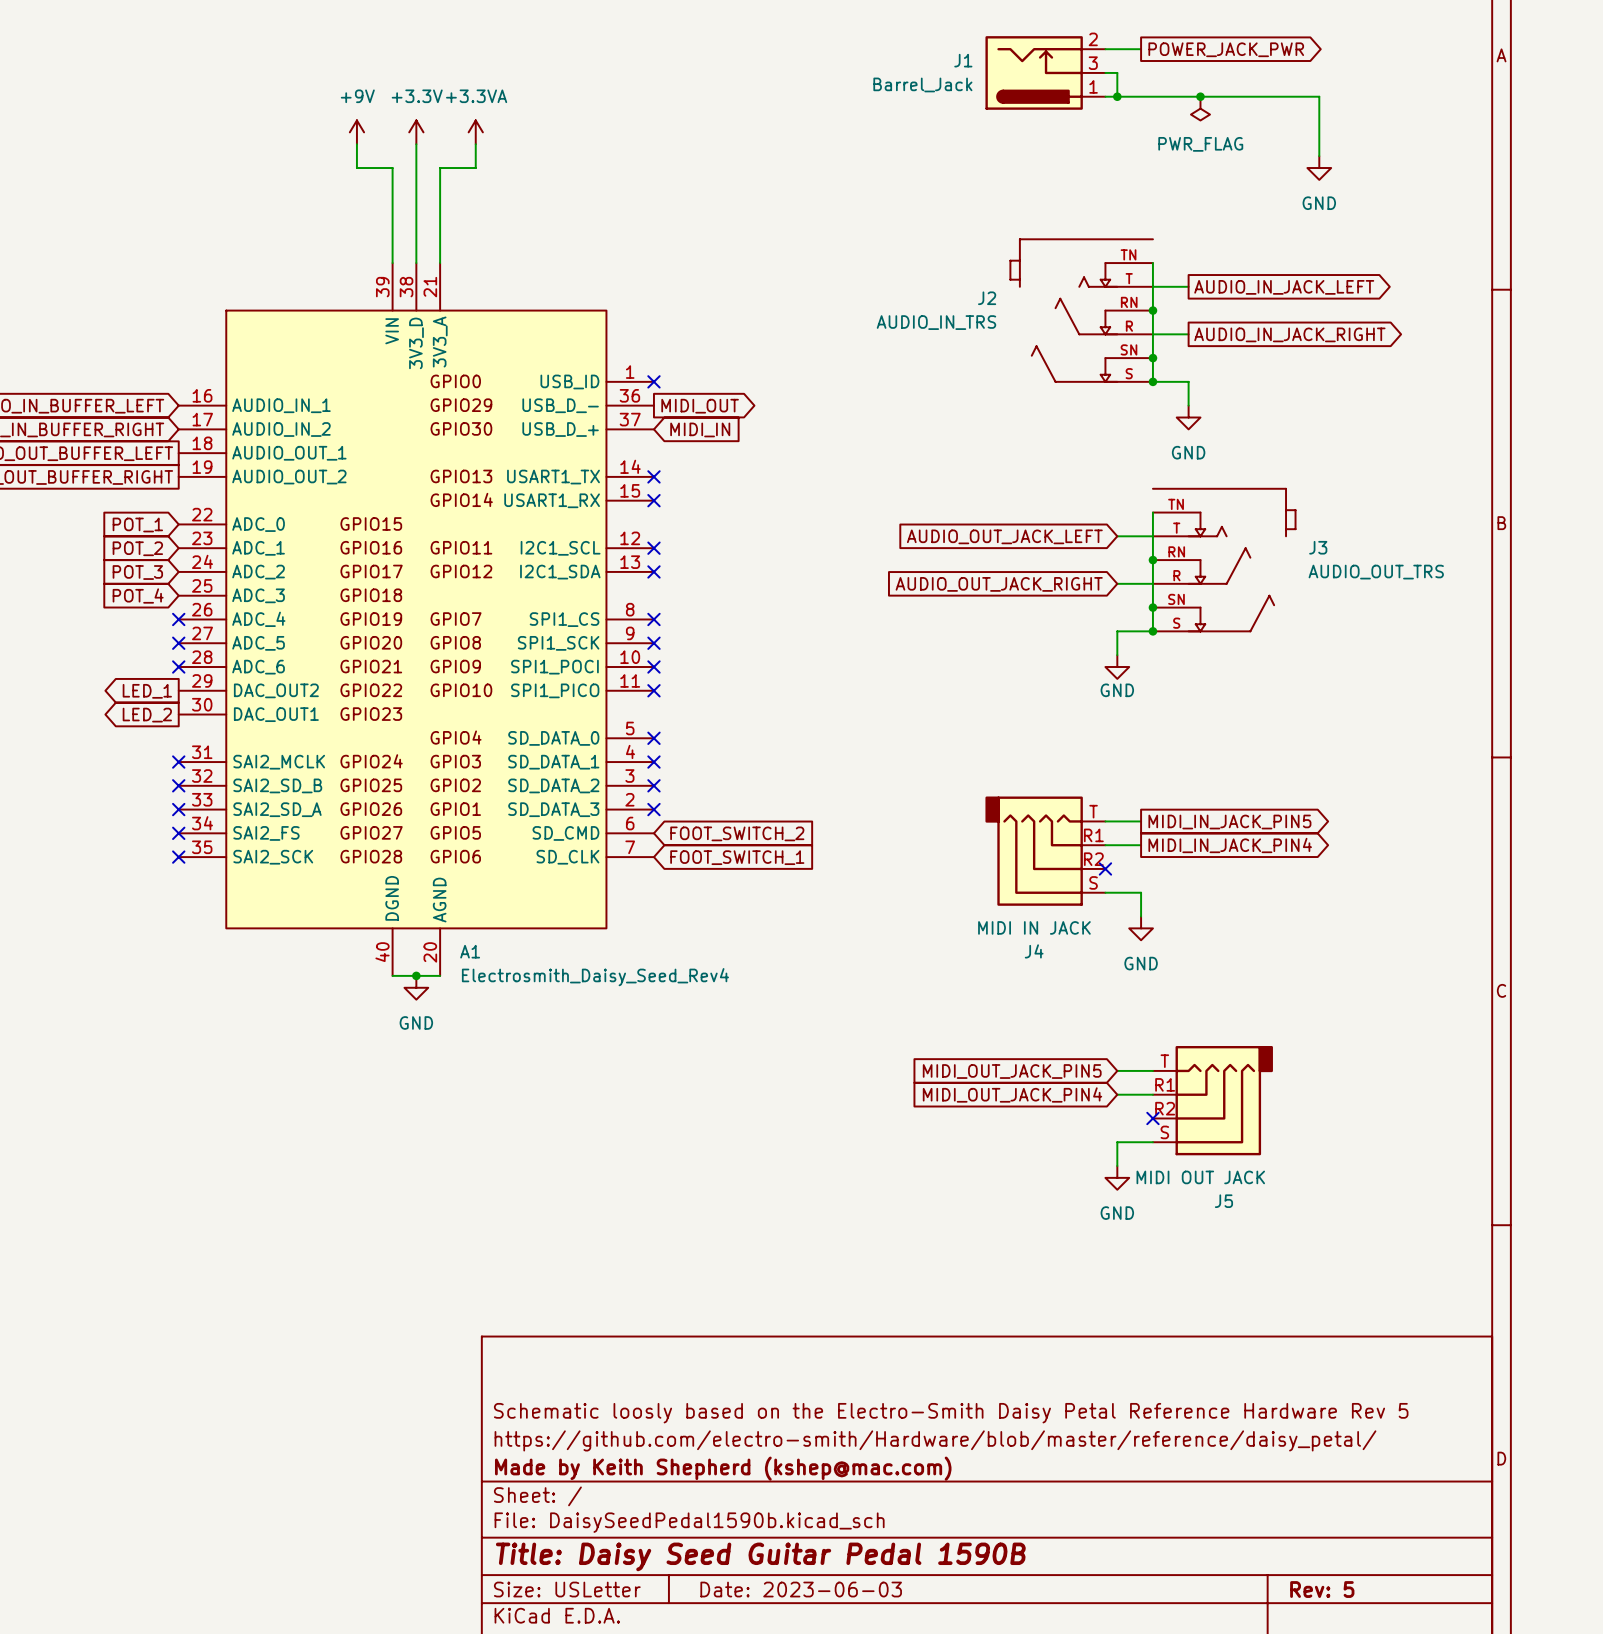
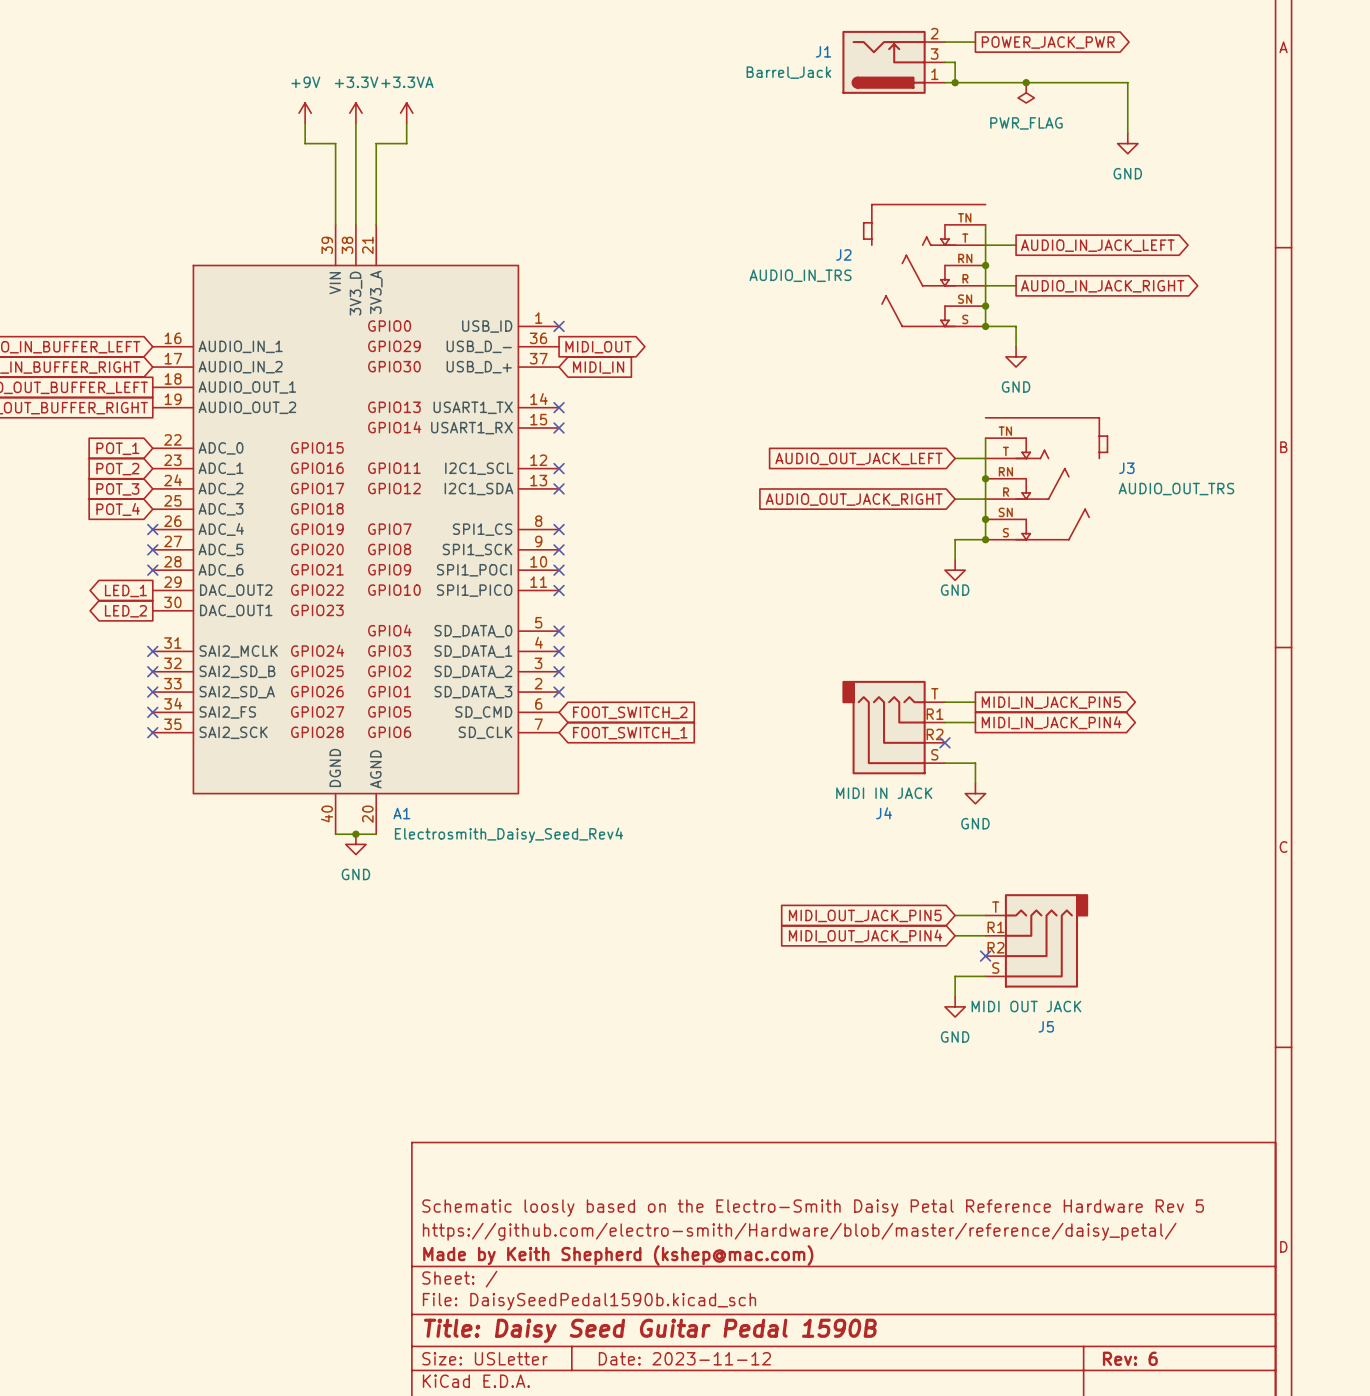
title block: Date: 2023-06-03 (801, 1589) -> Date: 2023-11-12 (684, 1358)
title block: Rev: 5 (1322, 1589) -> Rev: 6 (1130, 1358)

